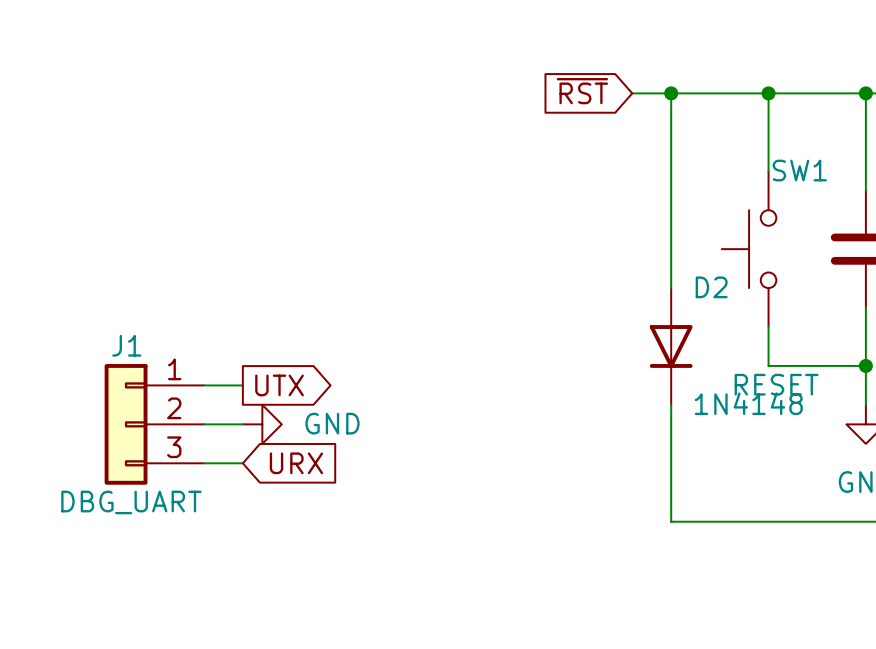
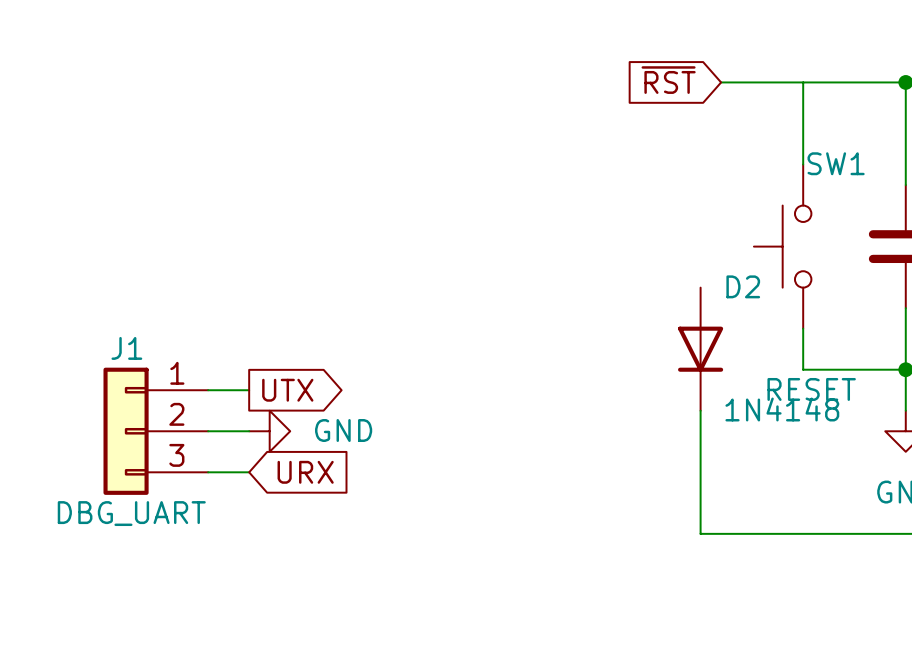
global label position: ~{RST} (582, 91) -> ~{RST} (668, 80)
wire: (632, 93) (690, 93) -> none
wire: (671, 93) (671, 288) -> none
junction: (671, 93) -> none
junction: (768, 93) -> none

